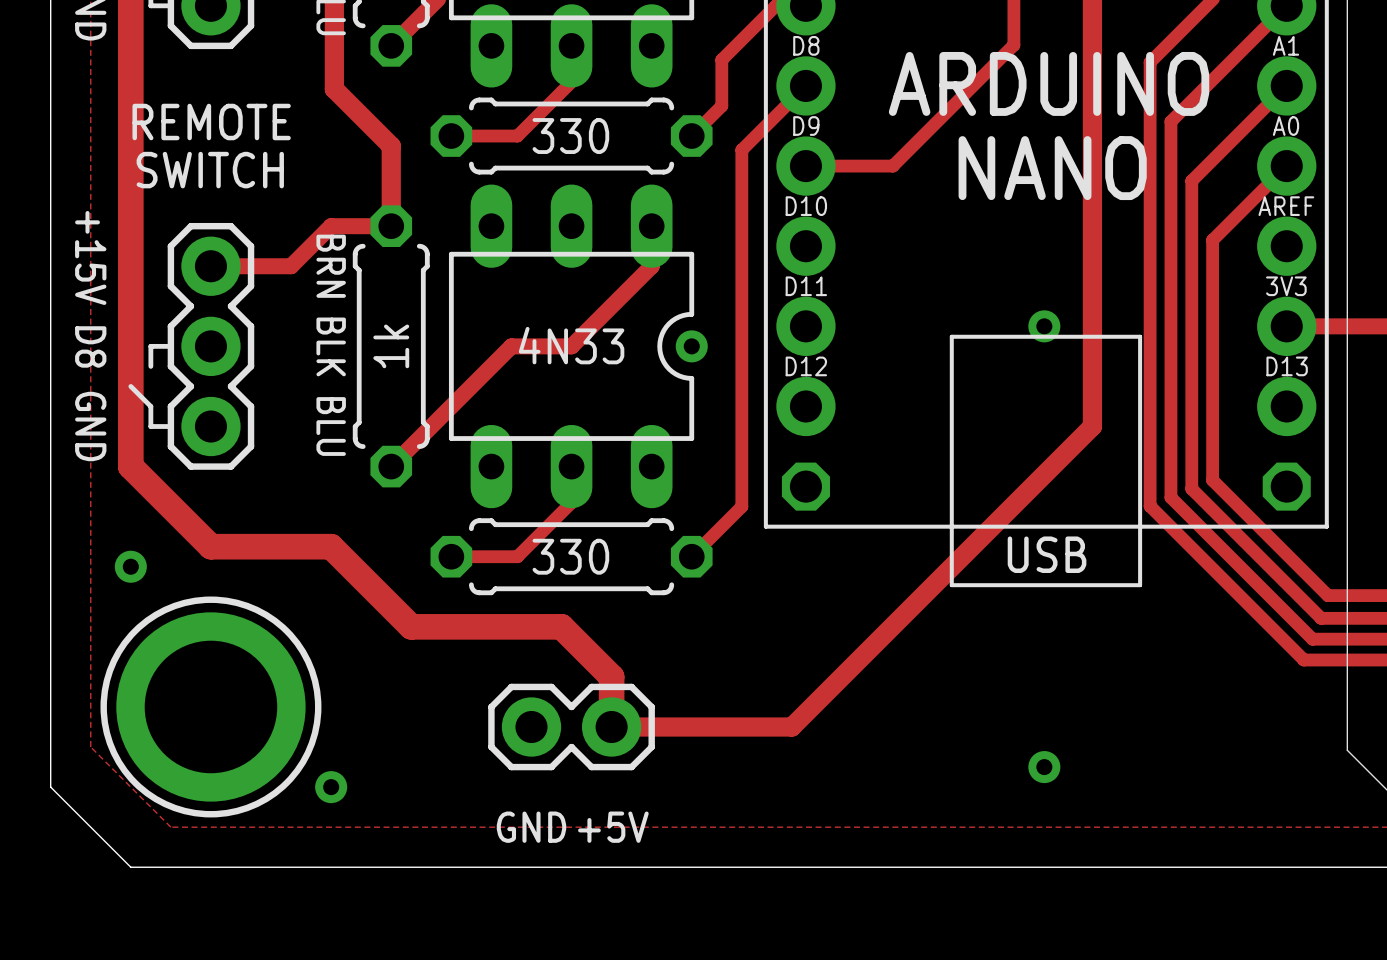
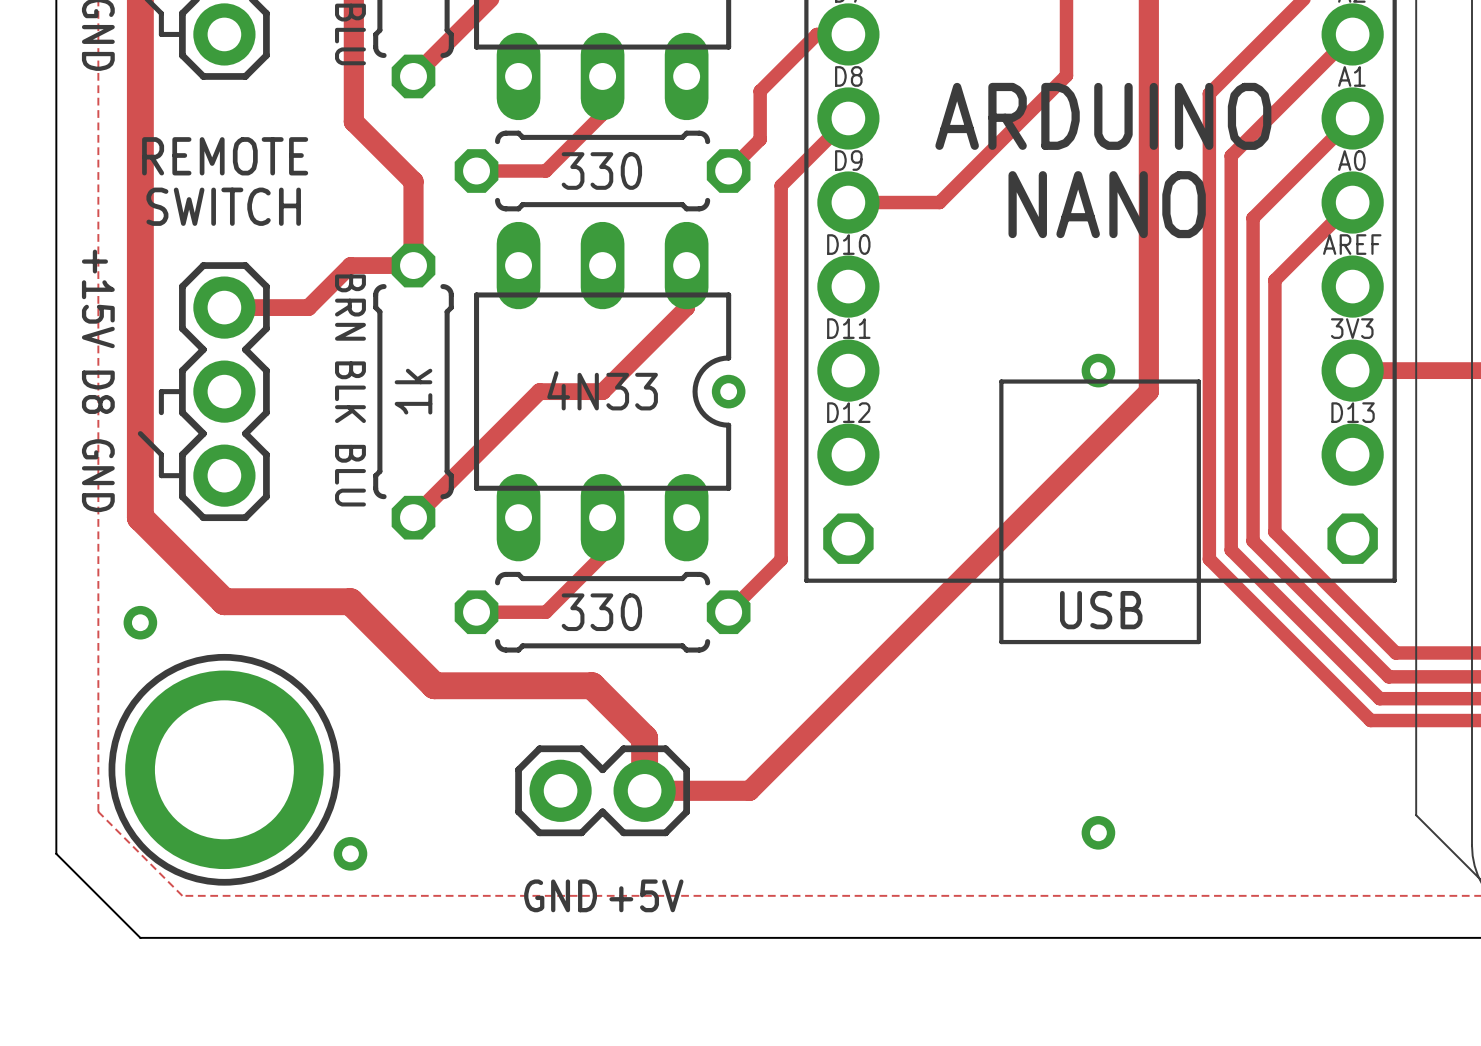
track: (1092, 346) (1092, 426) (791, 727) (711, 727) -> (1148, 391) (749, 790)

